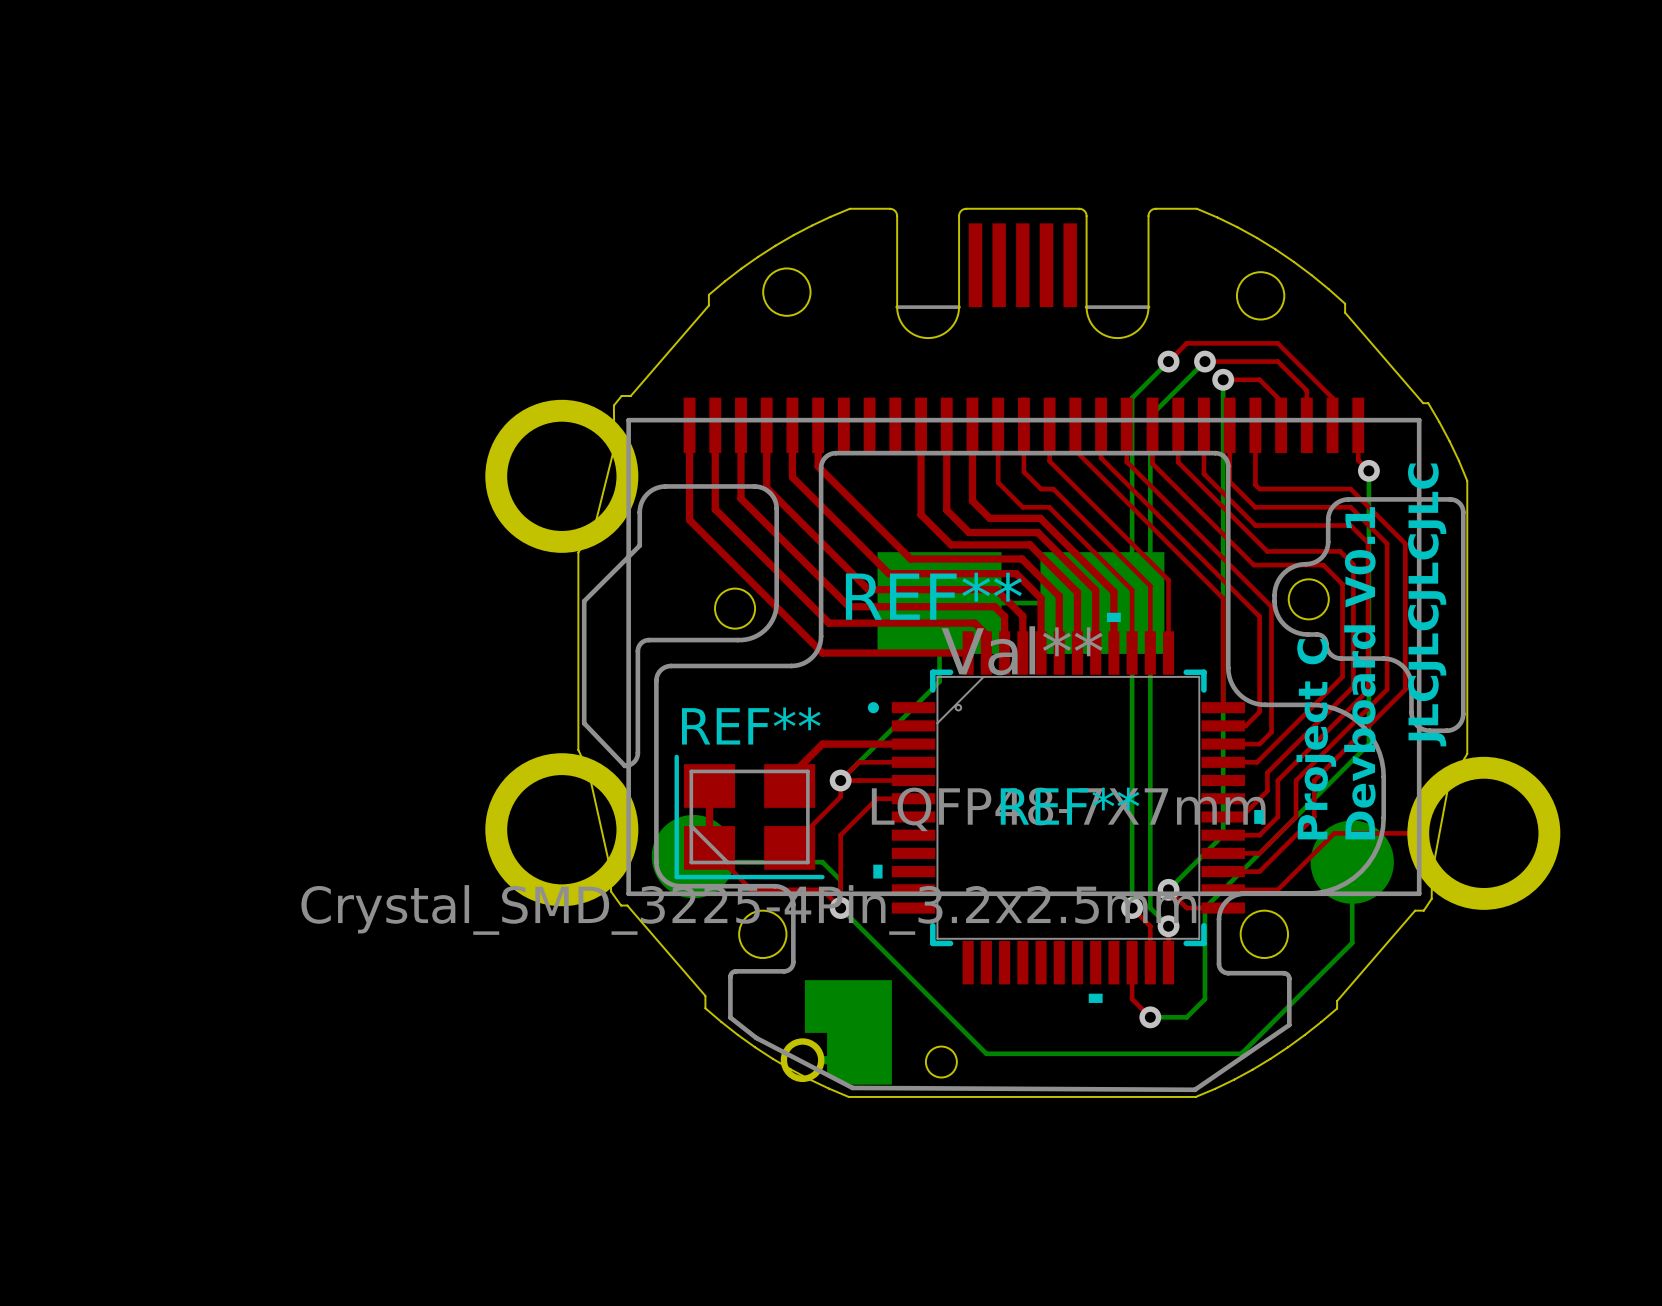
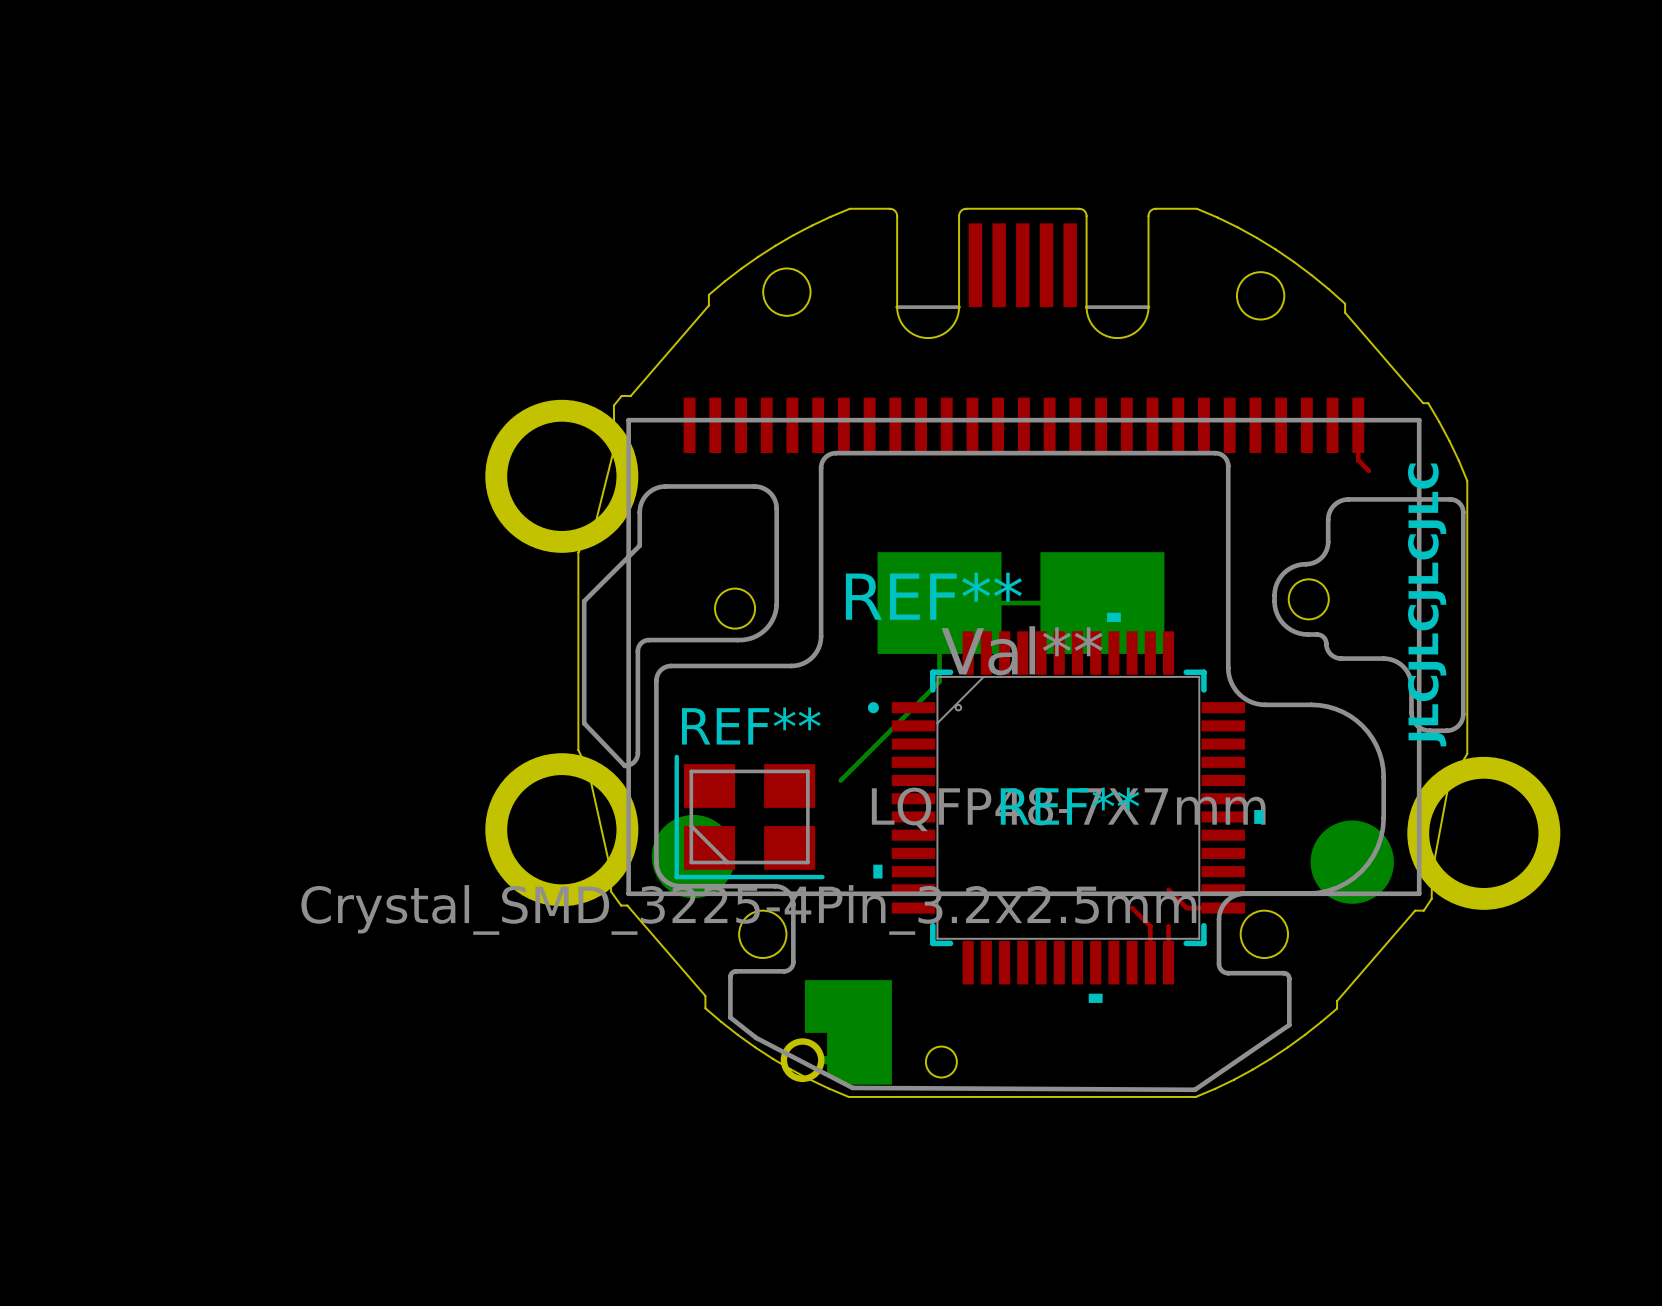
top track: (1168, 361) (1186, 343) (1277, 343) (1332, 398) (1332, 425) -> none
bottom track: (1168, 361) (1132, 398) (1132, 908) -> none
via: (1168, 361) -> none
top track: (1204, 361) (1277, 361) (1306, 390) (1306, 425) -> none
bottom track: (1204, 361) (1150, 416) (1150, 908) (1168, 926) -> none
via: (1204, 361) -> none
top track: (1223, 379) (1259, 379) (1281, 401) (1281, 425) -> none
bottom track: (1223, 379) (1223, 835) (1168, 889) -> none
via: (1223, 379) -> none
top track: (689, 425) (689, 520) (822, 653) (968, 653) -> none
top track: (715, 425) (715, 509) (828, 623) (974, 623) (986, 634) (986, 653) -> none
top track: (740, 425) (740, 498) (849, 606) (994, 606) (1004, 616) (1004, 653) -> none
top track: (766, 425) (766, 487) (868, 589) (996, 589) (1022, 616) (1022, 653) -> none
top track: (792, 425) (792, 477) (888, 573) (1016, 573) (1041, 598) (1041, 653) -> none
top track: (818, 425) (818, 466) (910, 559) (1021, 559) (1059, 596) (1059, 653) -> none
top track: (921, 425) (921, 514) (951, 544) (1029, 544) (1077, 592) (1077, 653) -> none
top track: (946, 425) (946, 510) (969, 532) (1037, 532) (1095, 590) (1095, 653) -> none
top track: (972, 425) (972, 501) (989, 518) (1040, 518) (1113, 591) (1113, 653) -> none
top track: (998, 425) (998, 482) (1022, 507) (1049, 507) (1132, 590) (1132, 653) -> none
top track: (1023, 425) (1023, 471) (1041, 489) (1053, 489) (1150, 585) (1150, 653) -> none
top track: (1049, 425) (1049, 461) (1168, 580) (1168, 653) -> none
top track: (1075, 425) (1075, 450) (1223, 598) (1223, 707) -> none
top track: (1101, 425) (1101, 458) (1259, 616) (1259, 712) (1245, 725) (1223, 725) -> none
top track: (1126, 425) (1126, 461) (1271, 606) (1271, 732) (1259, 744) (1223, 744) -> none
top track: (1152, 425) (1152, 463) (1253, 565) (1323, 565) (1342, 584) (1342, 676) (1257, 762) (1223, 762) -> none
top track: (1178, 425) (1178, 462) (1267, 551) (1340, 551) (1353, 564) (1353, 686) (1267, 772) (1267, 790) (1241, 816) (1223, 816) -> none
top track: (1203, 425) (1203, 473) (1255, 525) (1350, 525) (1368, 542) (1368, 690) (1277, 780) (1277, 816) (1259, 835) (1223, 835) -> none
top track: (1229, 425) (1229, 481) (1255, 507) (1350, 507) (1387, 543) (1387, 689) (1296, 780) (1296, 816) (1259, 853) (1223, 853) -> none
top track: (1255, 425) (1255, 484) (1259, 489) (1350, 489) (1405, 543) (1405, 689) (1314, 780) (1314, 816) (1259, 871) (1223, 871) -> none
bottom track: (1368, 470) (1368, 744) (1204, 908) (1204, 999) (1186, 1017) (1150, 1017) -> none
via: (1368, 470) -> none
text: Devboard V0.1 (1359, 673) -> none
text: Project C (1316, 739) -> none
top track: (913, 744) (822, 744) (789, 776) (789, 785) -> none
top track: (913, 762) (858, 762) (840, 780) -> none
top track: (840, 780) (913, 780) -> none
top track: (840, 780) (840, 796) (789, 847) -> none
via: (840, 780) -> none
top track: (709, 785) (709, 847) (751, 889) (822, 889) (840, 908) (840, 835) (877, 798) (913, 798) -> none
top track: (1483, 833) (1334, 833) (1277, 889) (1223, 889) -> none
bottom track: (693, 856) (698, 862) (822, 862) (840, 880) (840, 908) (986, 1053) (1241, 1053) (1352, 942) (1352, 862) -> none
via: (1168, 889) -> none
via: (840, 908) -> none
via: (1132, 908) -> none
via: (1168, 926) -> none
top track: (1132, 962) (1132, 999) (1150, 1017) -> none
via: (1150, 1017) -> none

